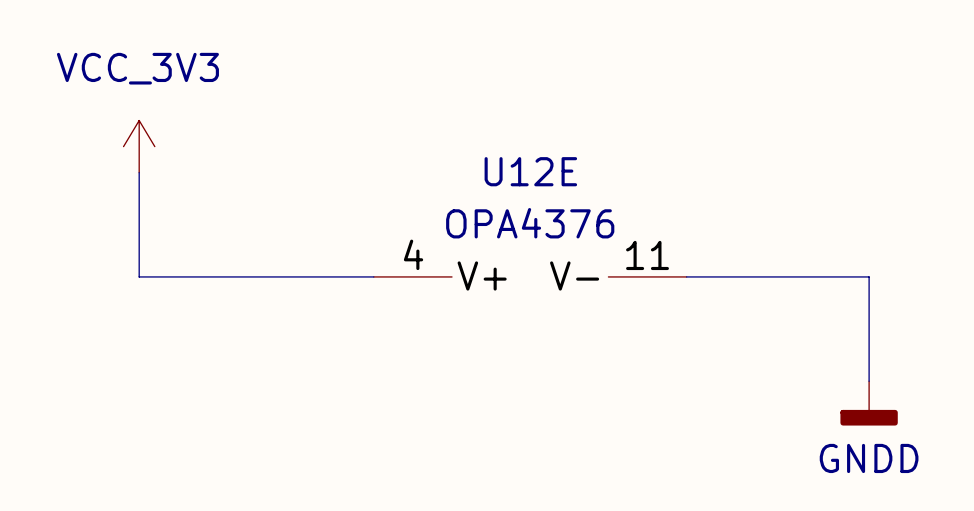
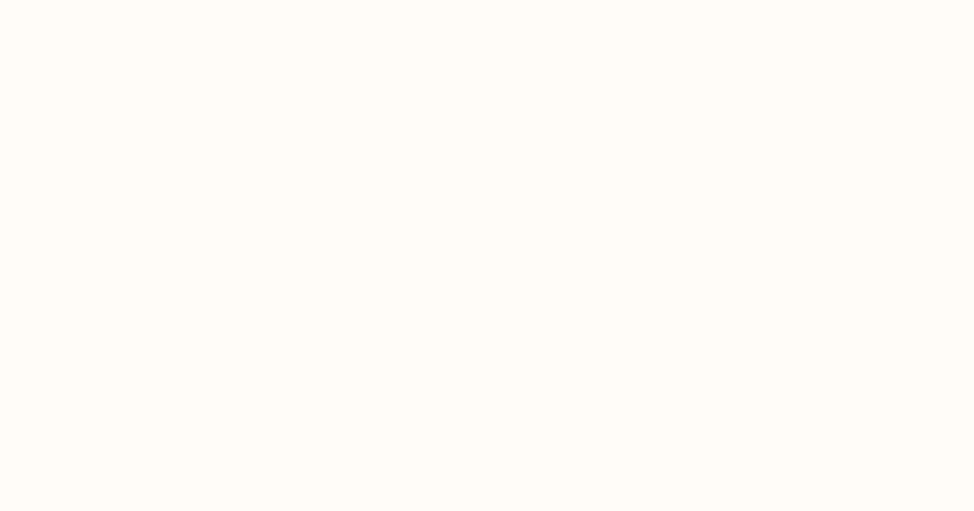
power symbol: VCC_3V3 (139, 146) -> none
wire: (139, 172) (139, 276) (373, 276) -> none
U12E: OPA4376 (530, 276) -> none
wire: (686, 276) (869, 276) (869, 381) -> none
power symbol: GNDD (869, 403) -> none

